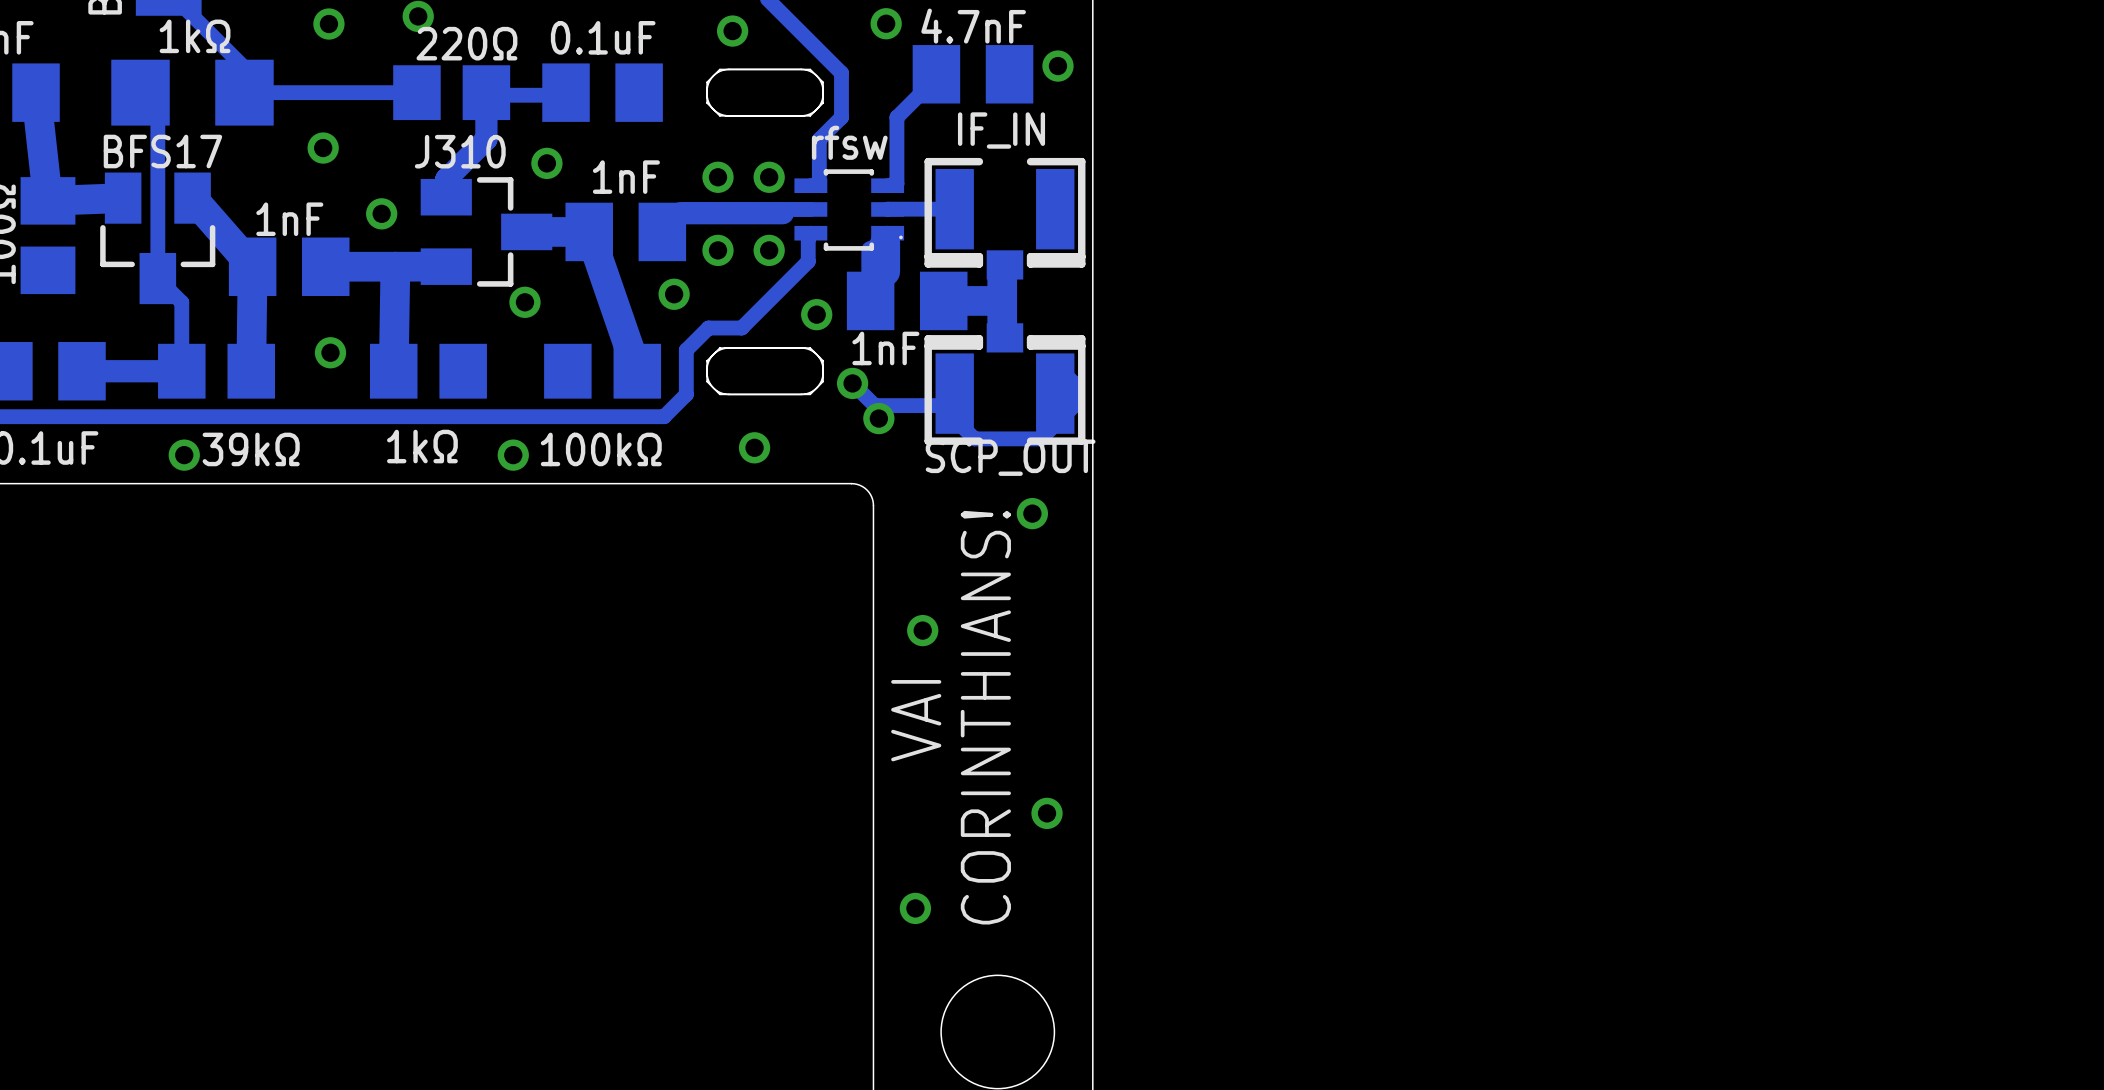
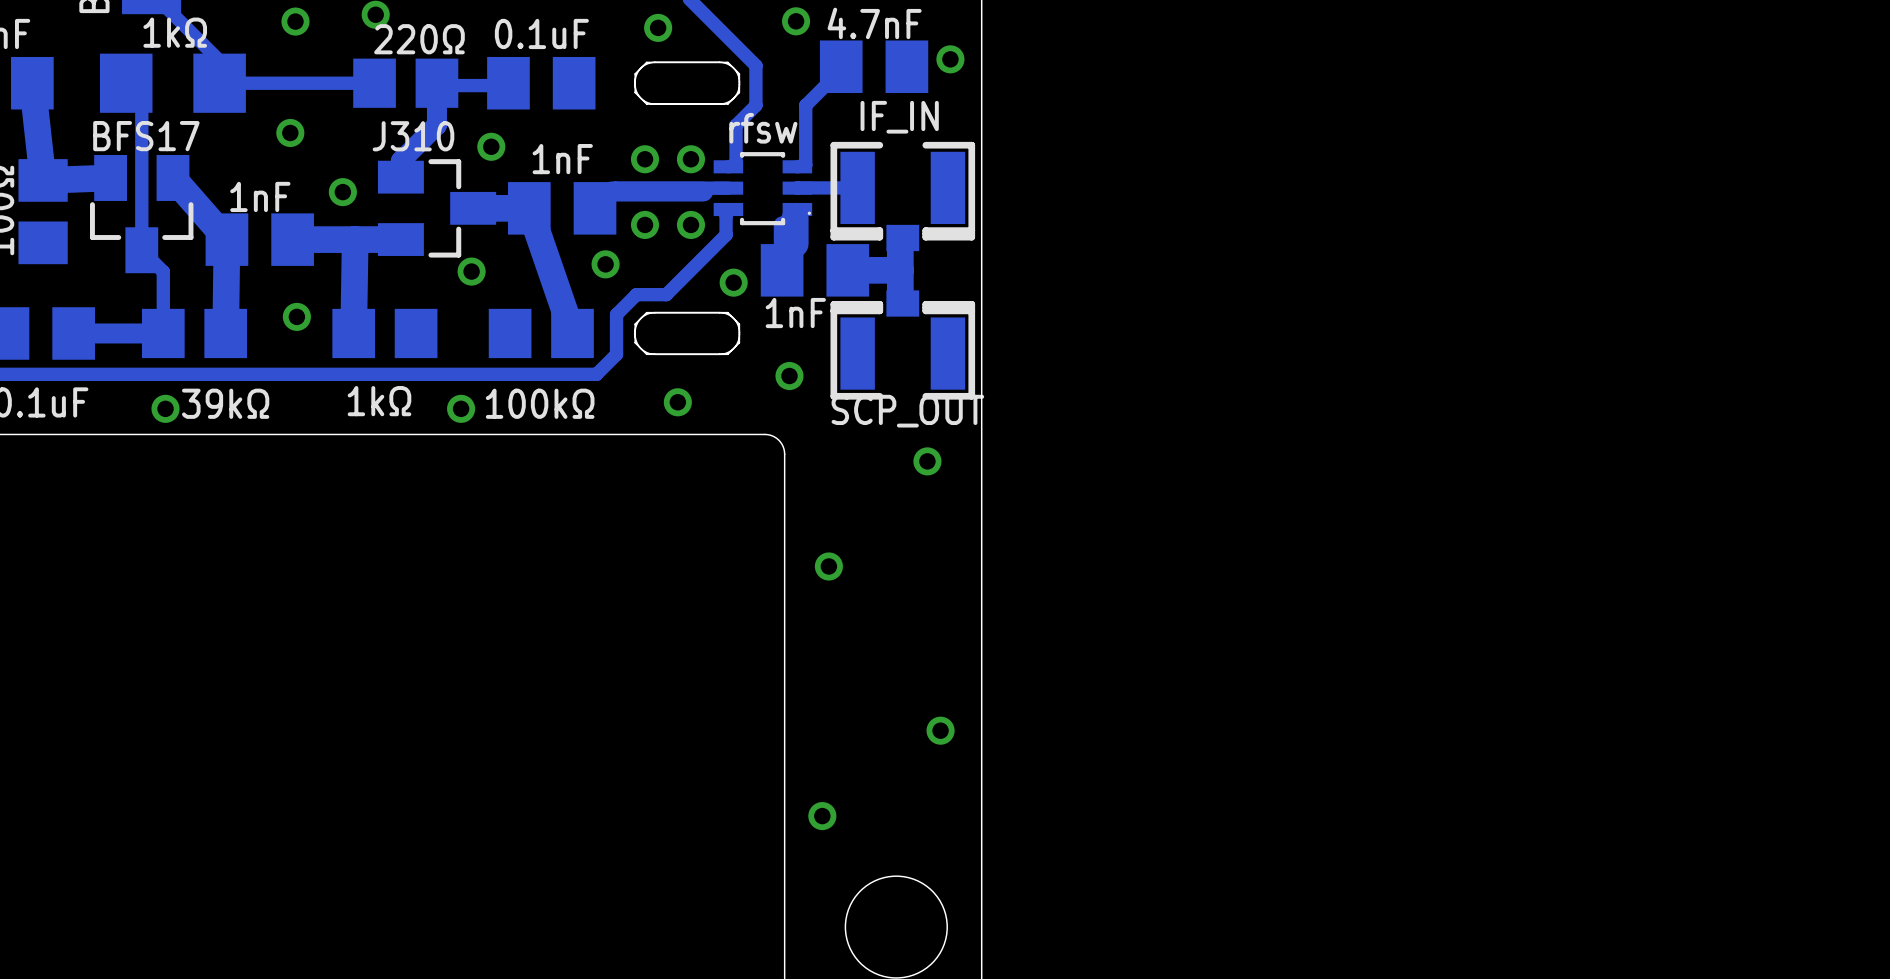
bottom track: (1055, 372) (1063, 372) (1074, 383) (1074, 405) (1041, 438) (974, 438) (941, 405) (874, 405) (852, 383) -> none
via: (852, 383) -> none
text: CORINTHIANS! (985, 717) -> none
text: VAI (916, 720) -> none

